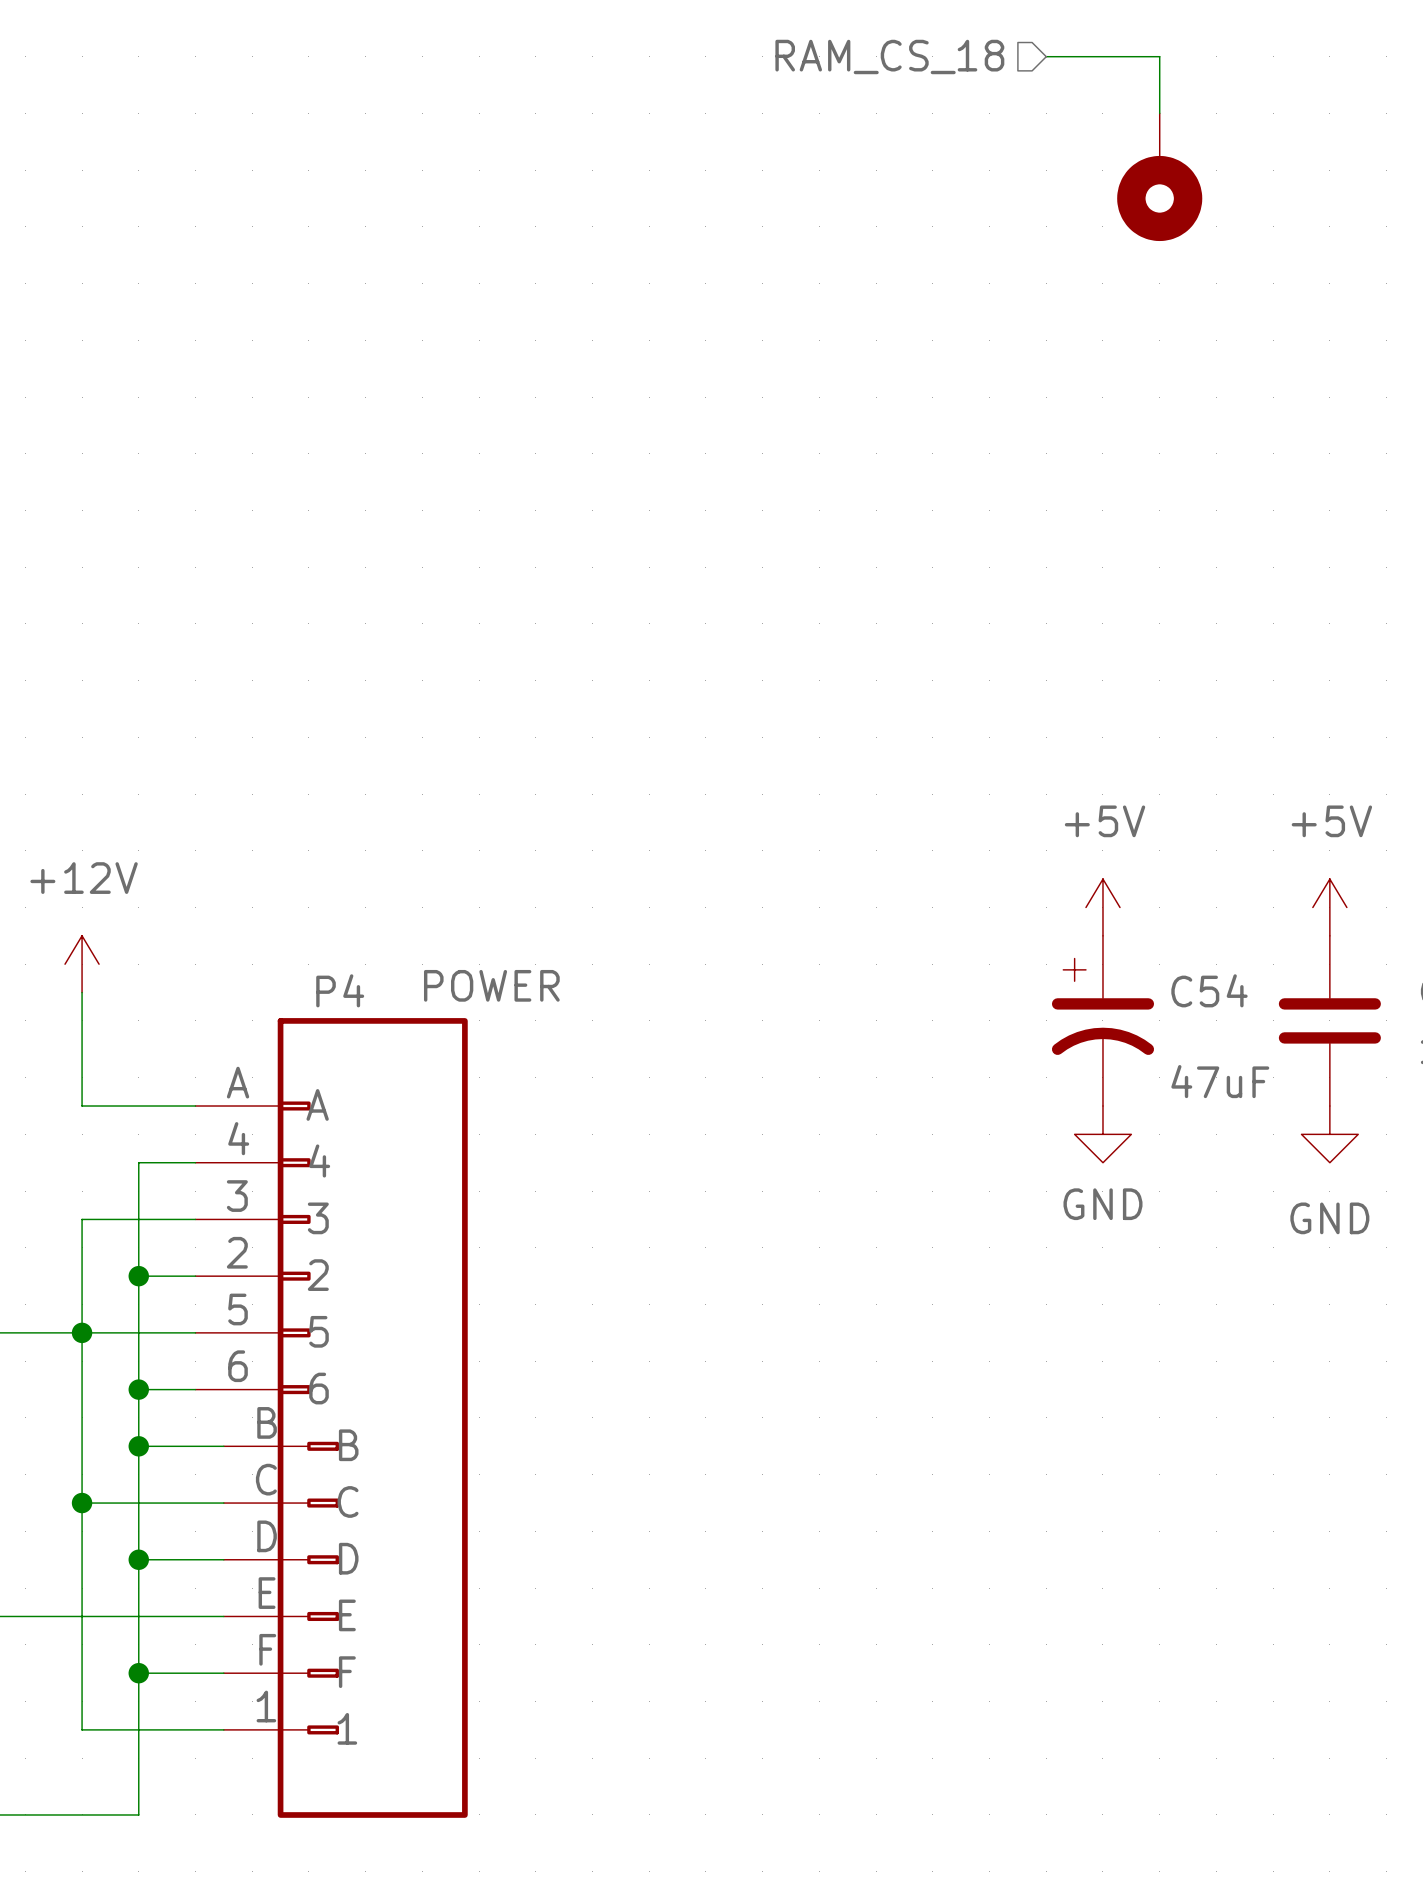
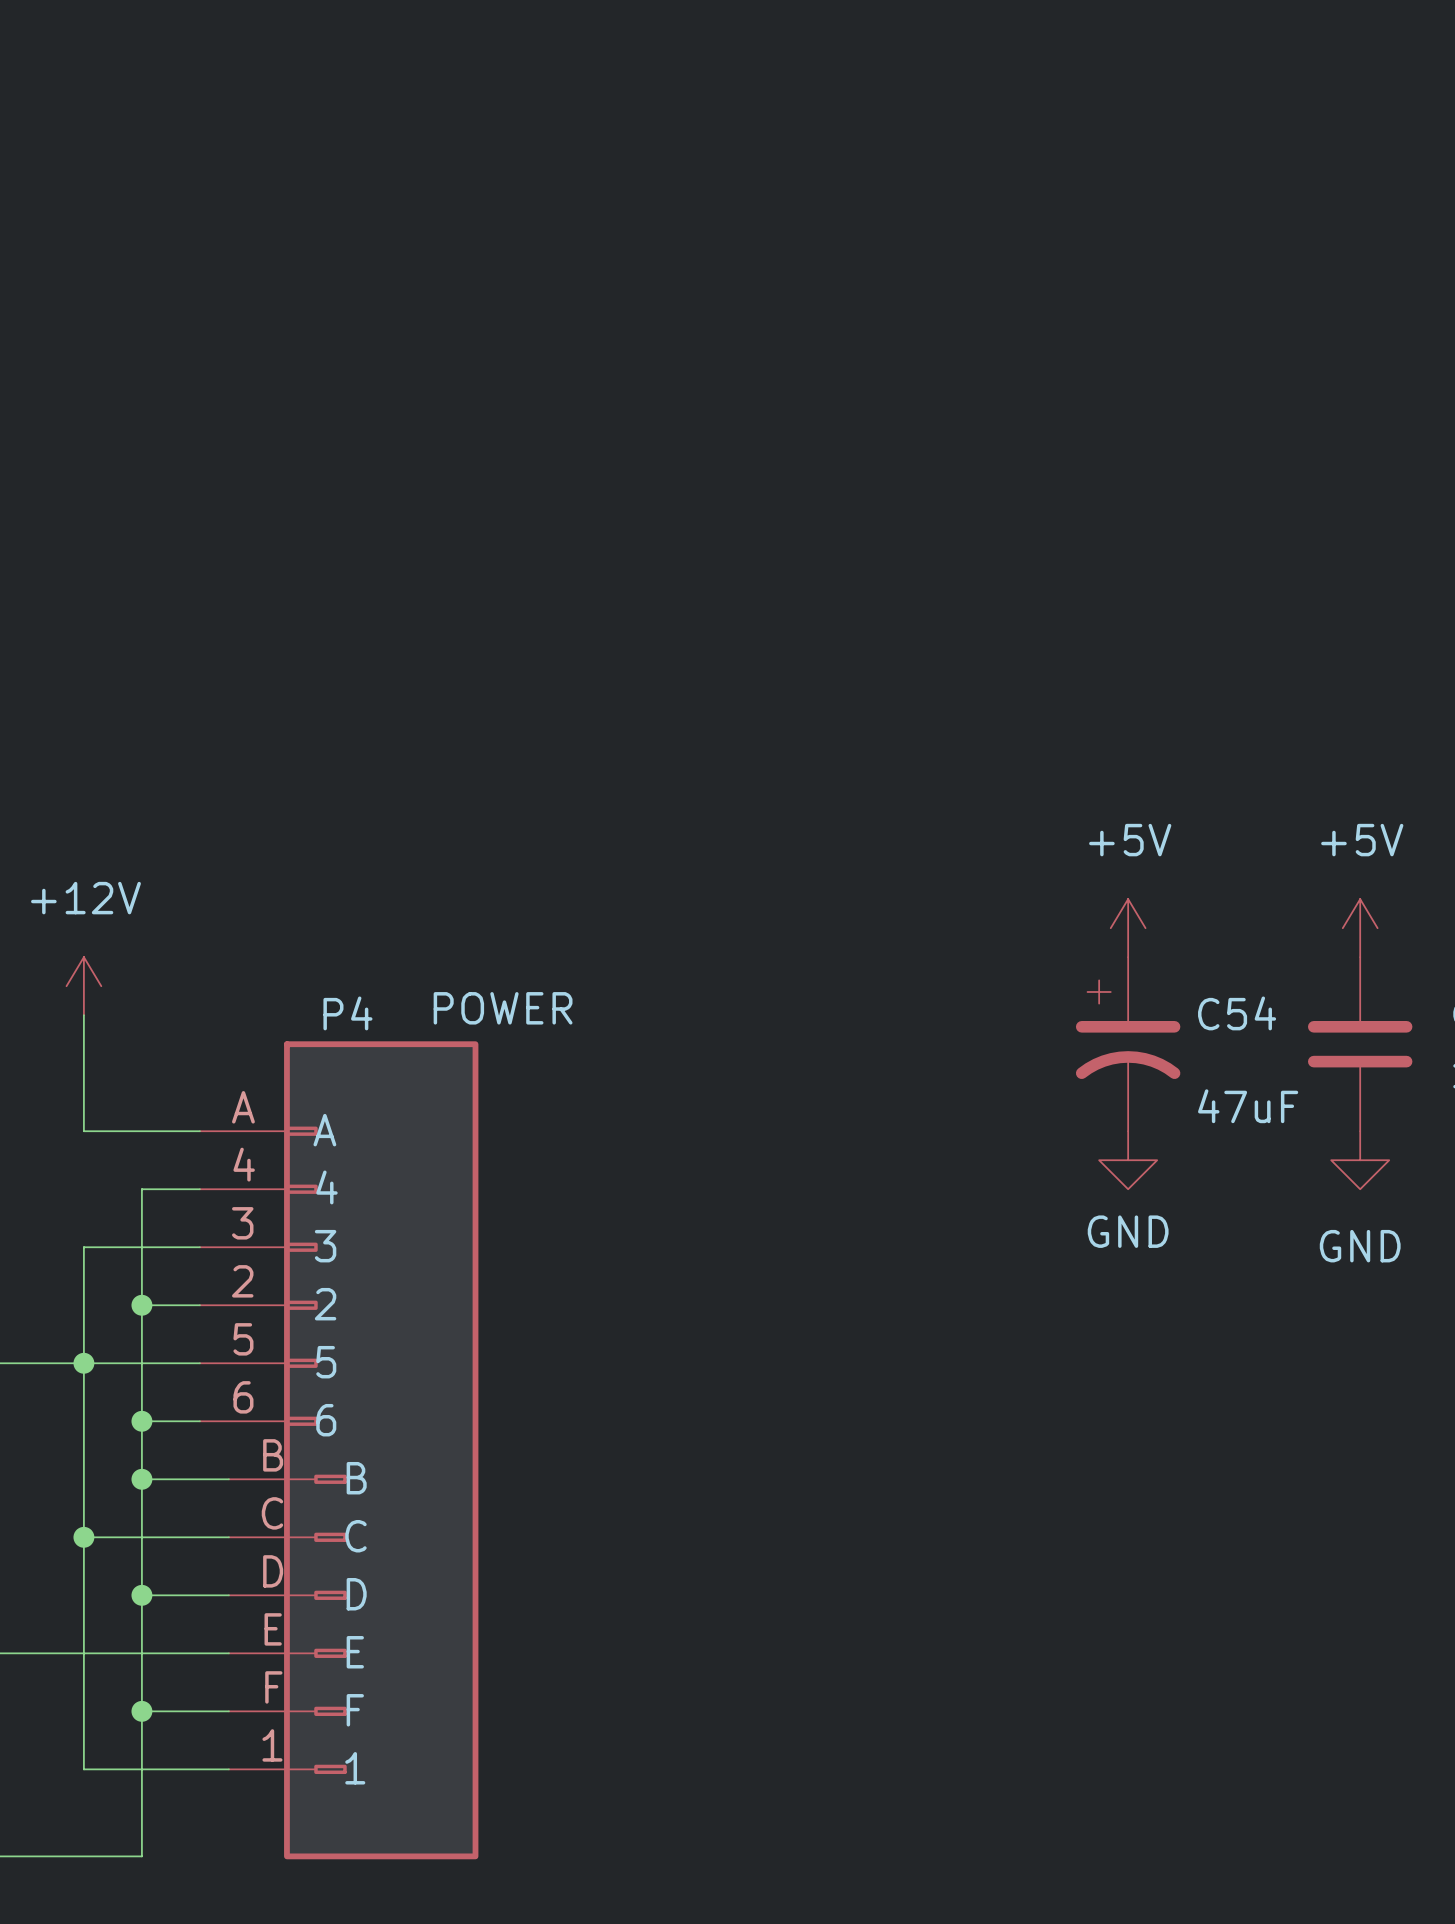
hierarchical label: RAM_CS_18 (889, 56) -> none
wire: (1046, 56) (1159, 56) (1159, 113) -> none
part: (1159, 177) -> none

